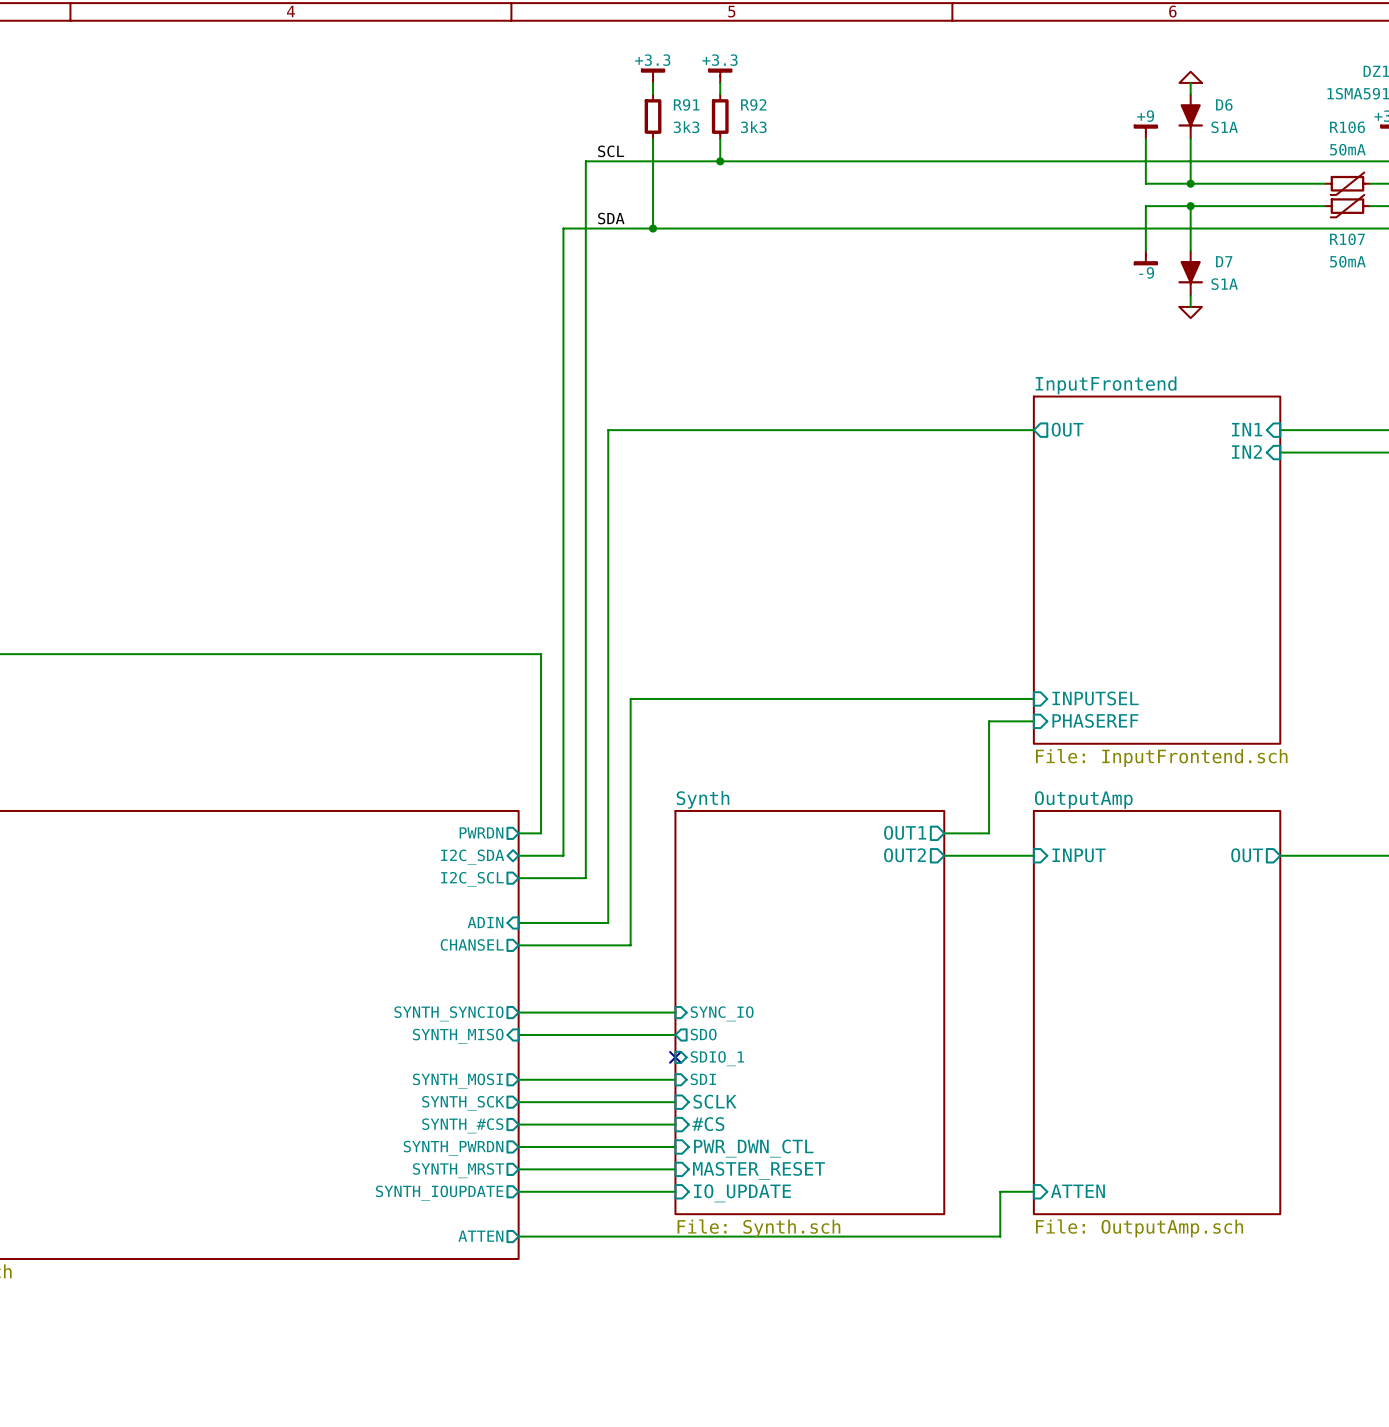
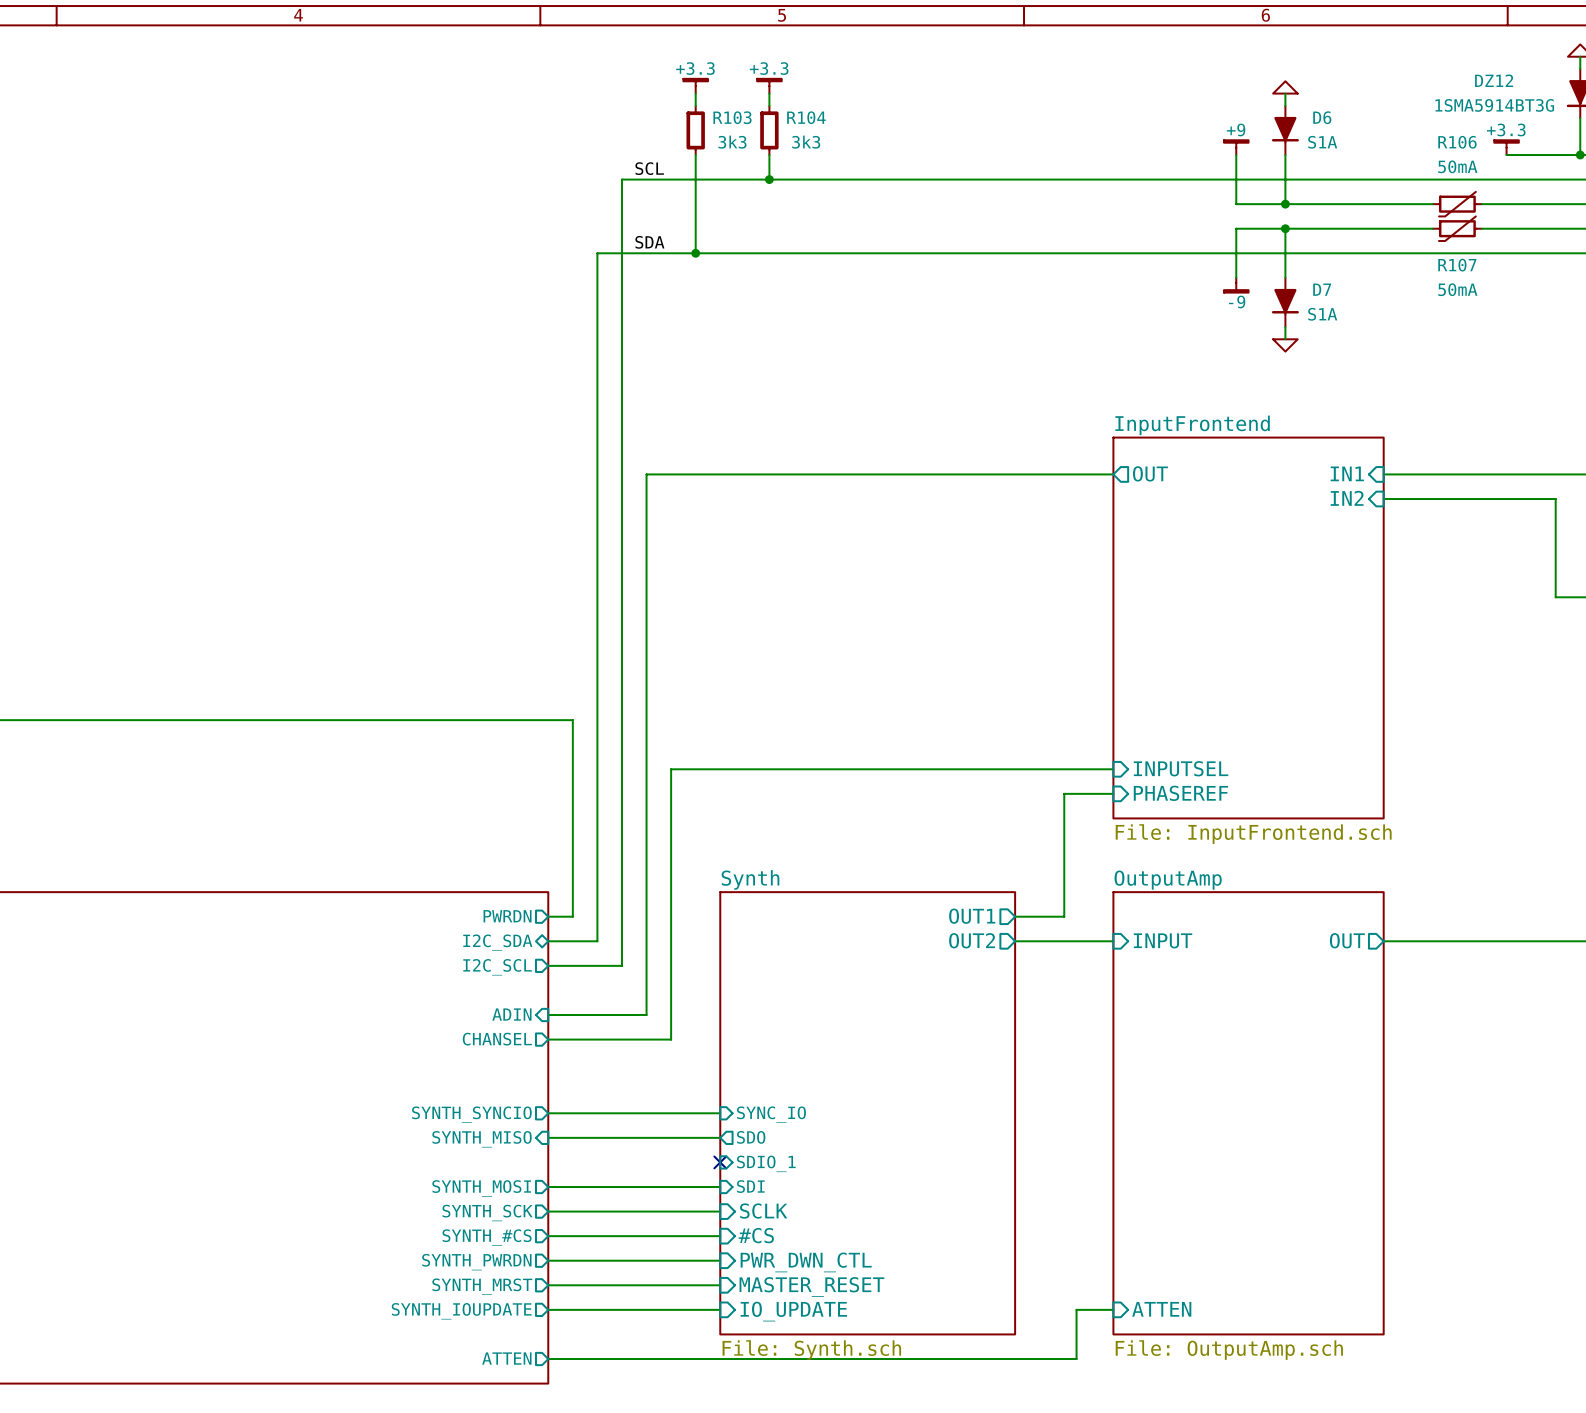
R91 name: R91 (686, 104) -> R103 (732, 117)
R92 name: R92 (753, 104) -> R104 (806, 117)

